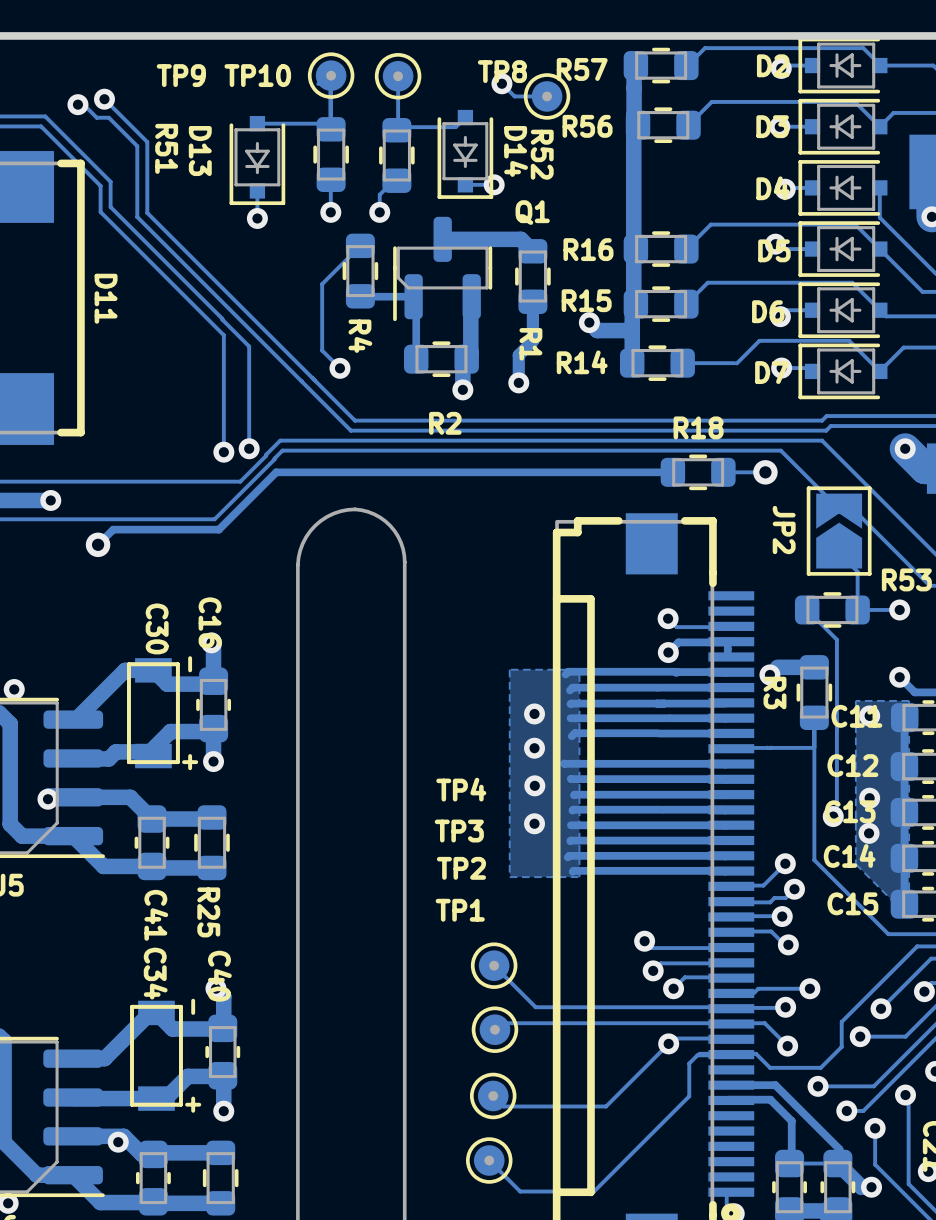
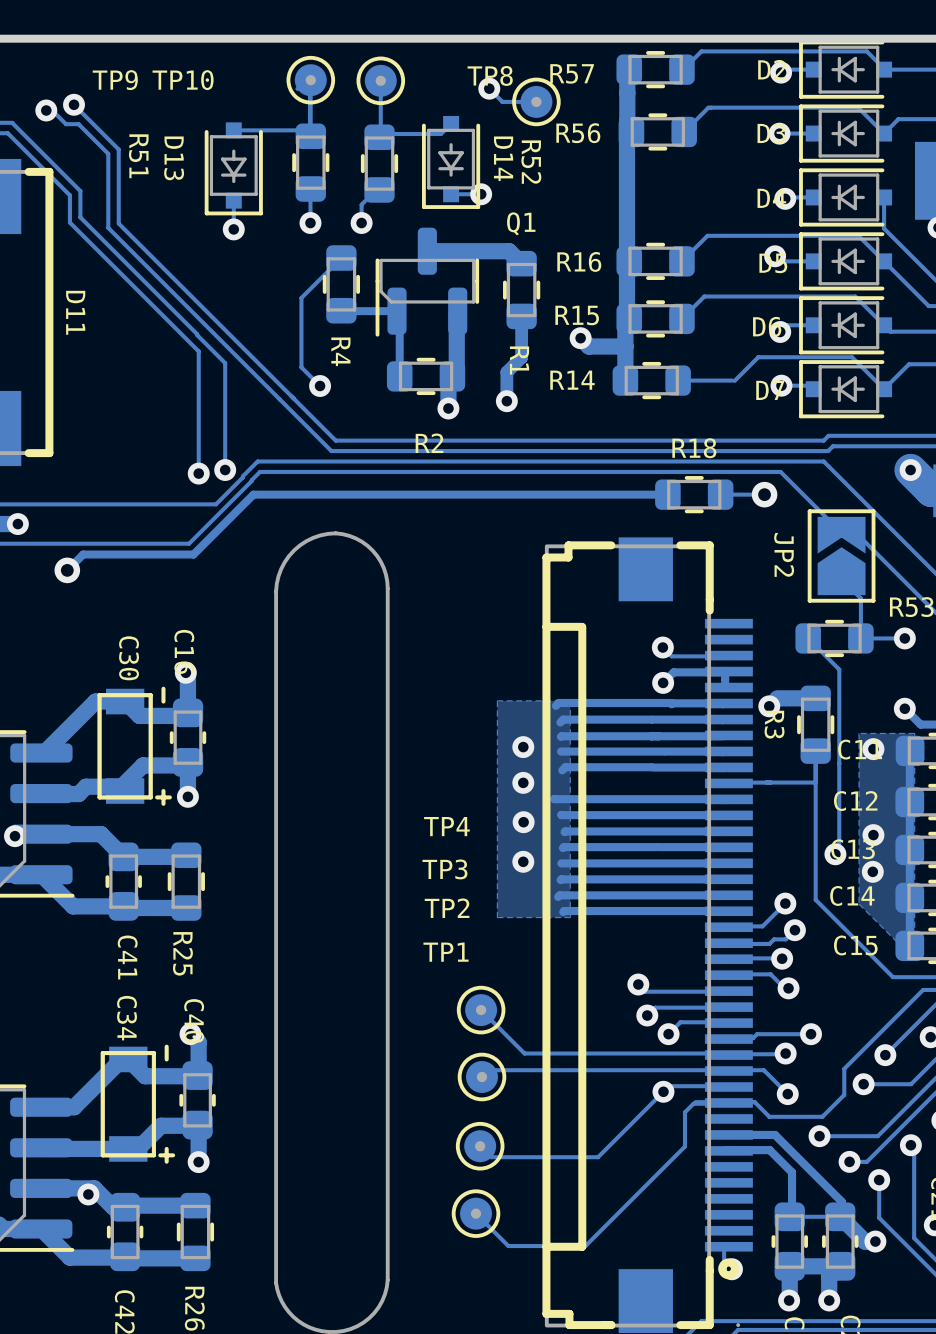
TP9 name position: TP9 (181, 75) -> TP9 (115, 80)
TP10 name position: TP10 (257, 75) -> TP10 (183, 80)

